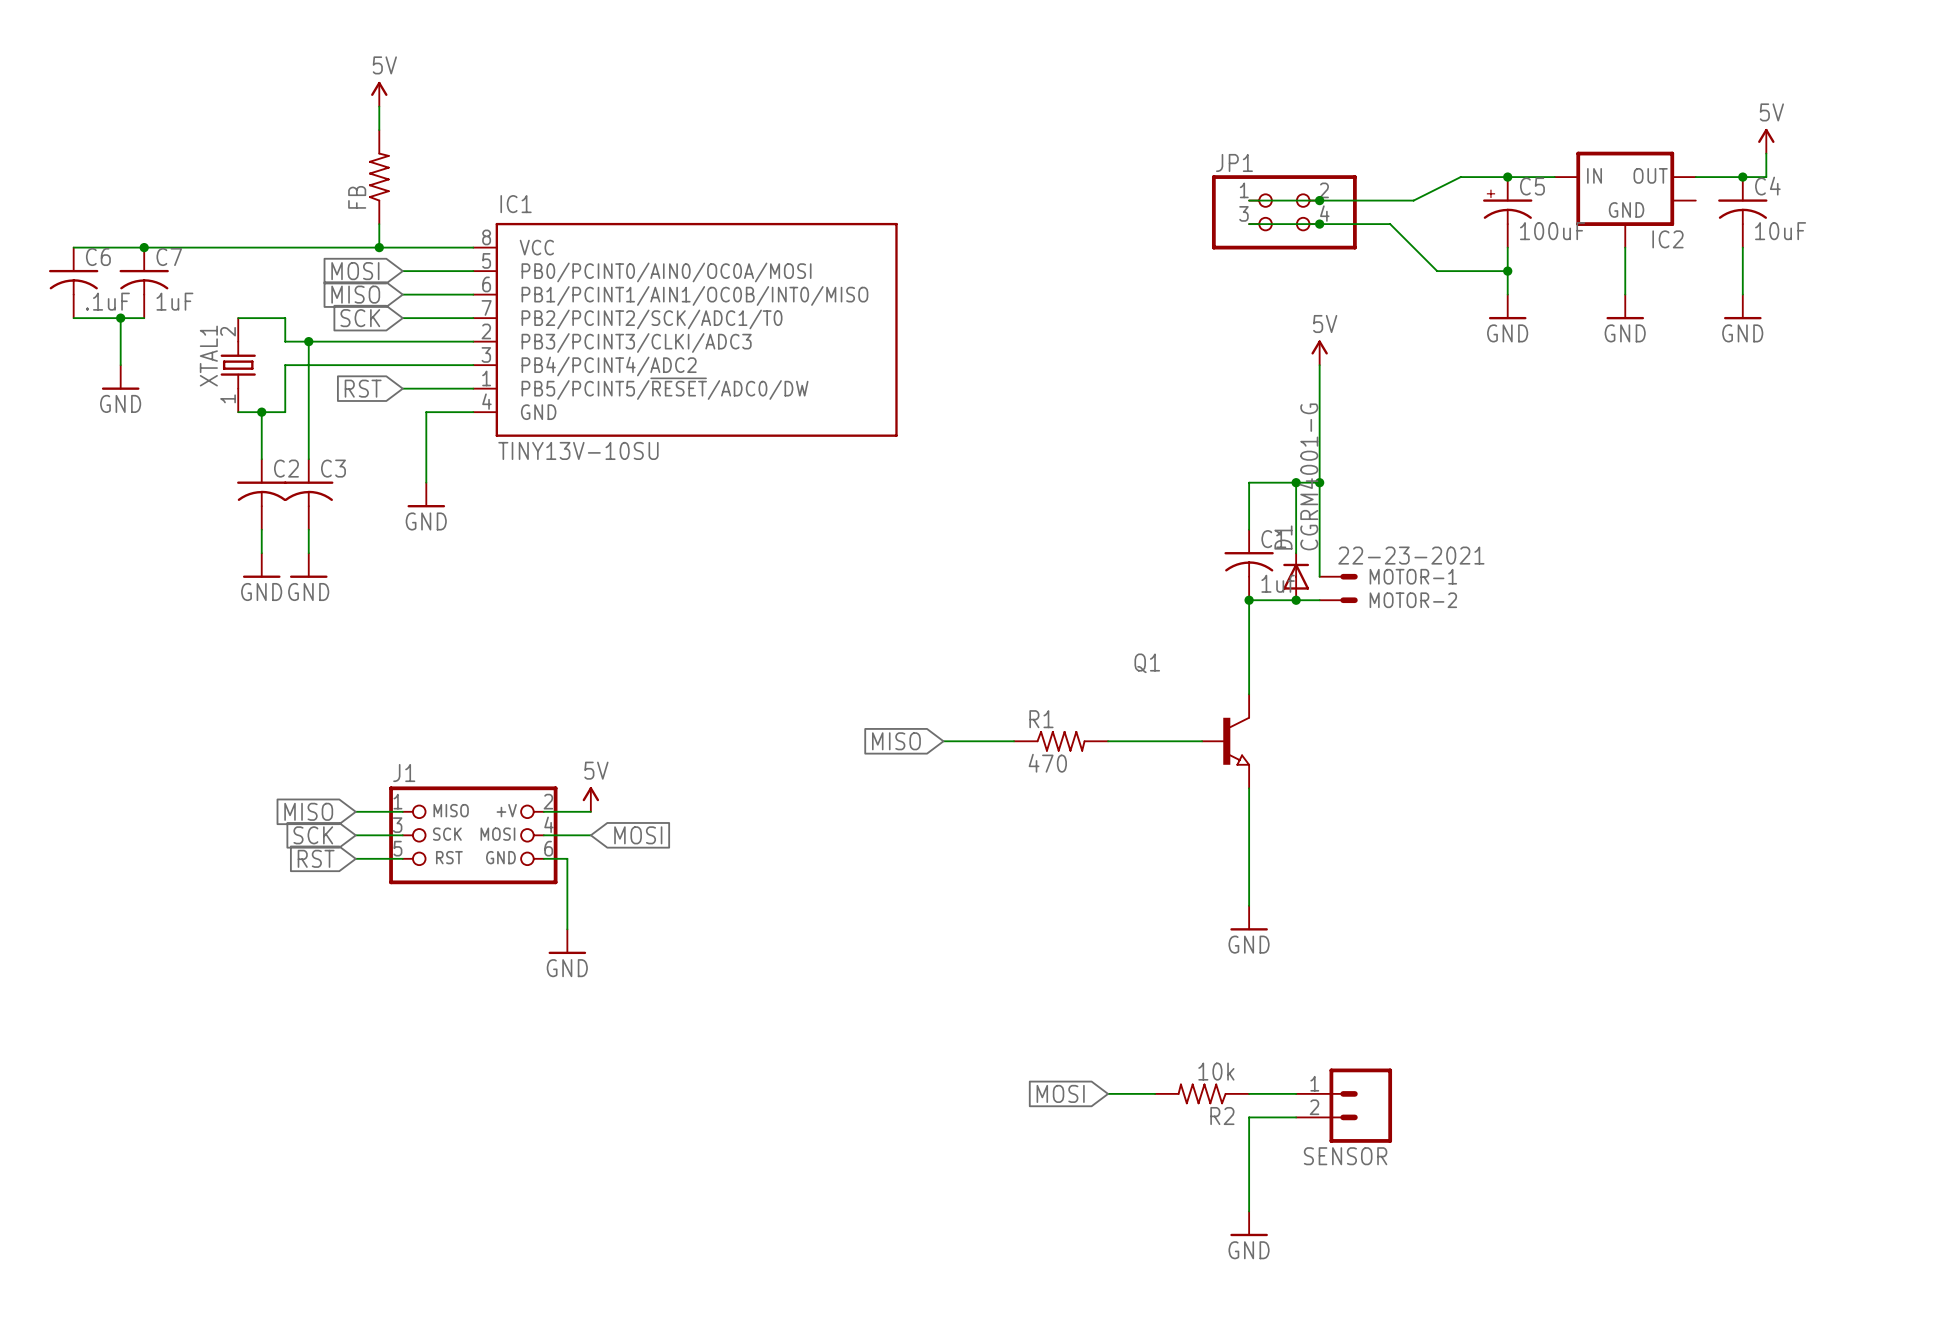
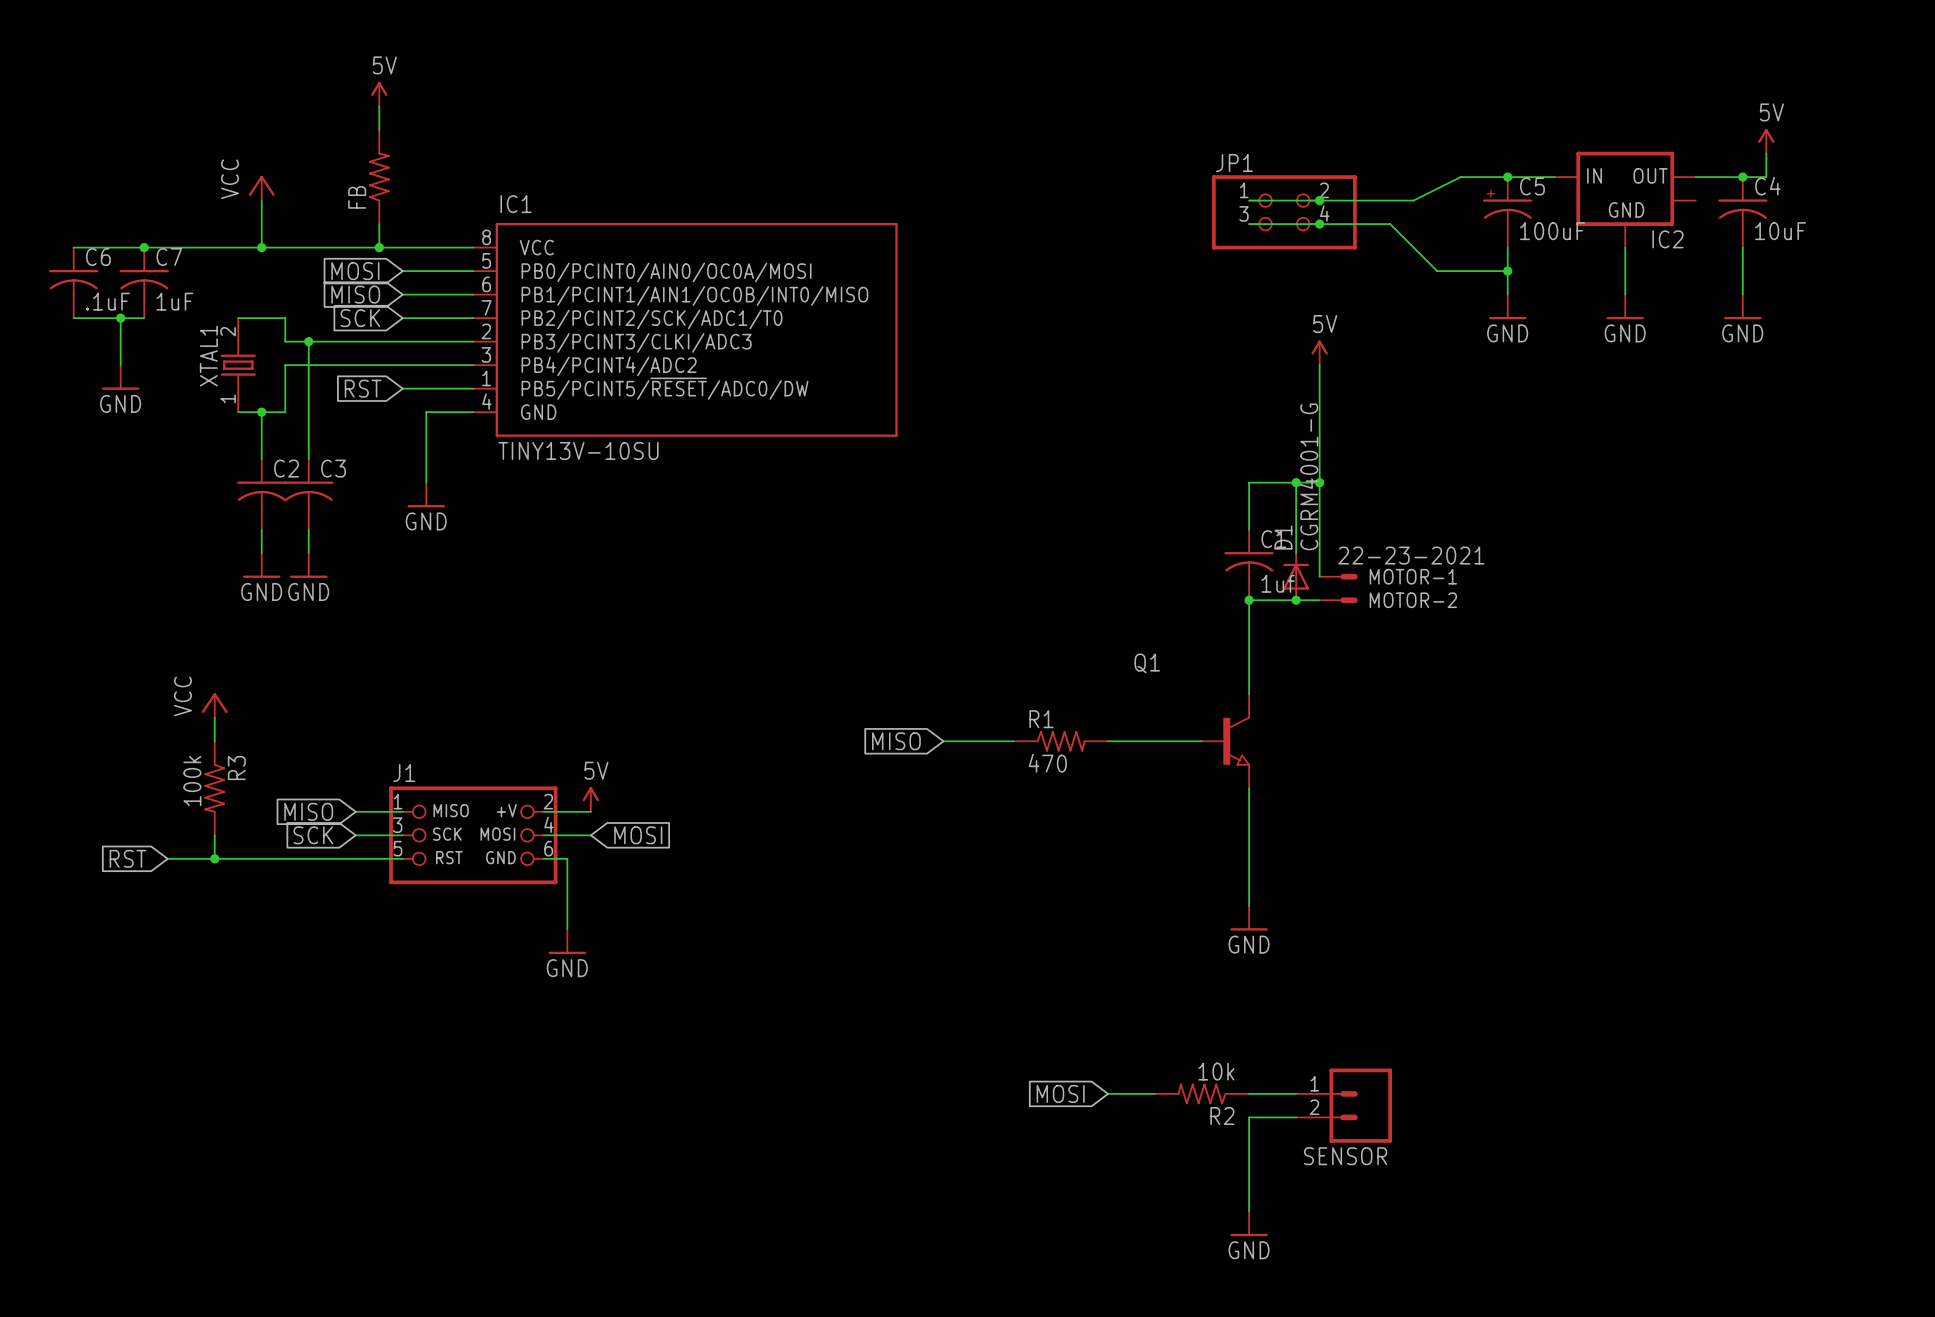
power symbol: none -> VCC (261, 188)
wire: none -> (261, 200) (261, 247)
junction: none -> (261, 247)
power symbol: none -> VCC (214, 705)
wire: none -> (214, 717) (214, 741)
R3: none -> 100k (214, 788)
wire: none -> (214, 835) (214, 858)
wire: none -> (167, 858) (355, 858)
junction: none -> (214, 858)
global label position: RST (316, 858) -> RST (128, 858)

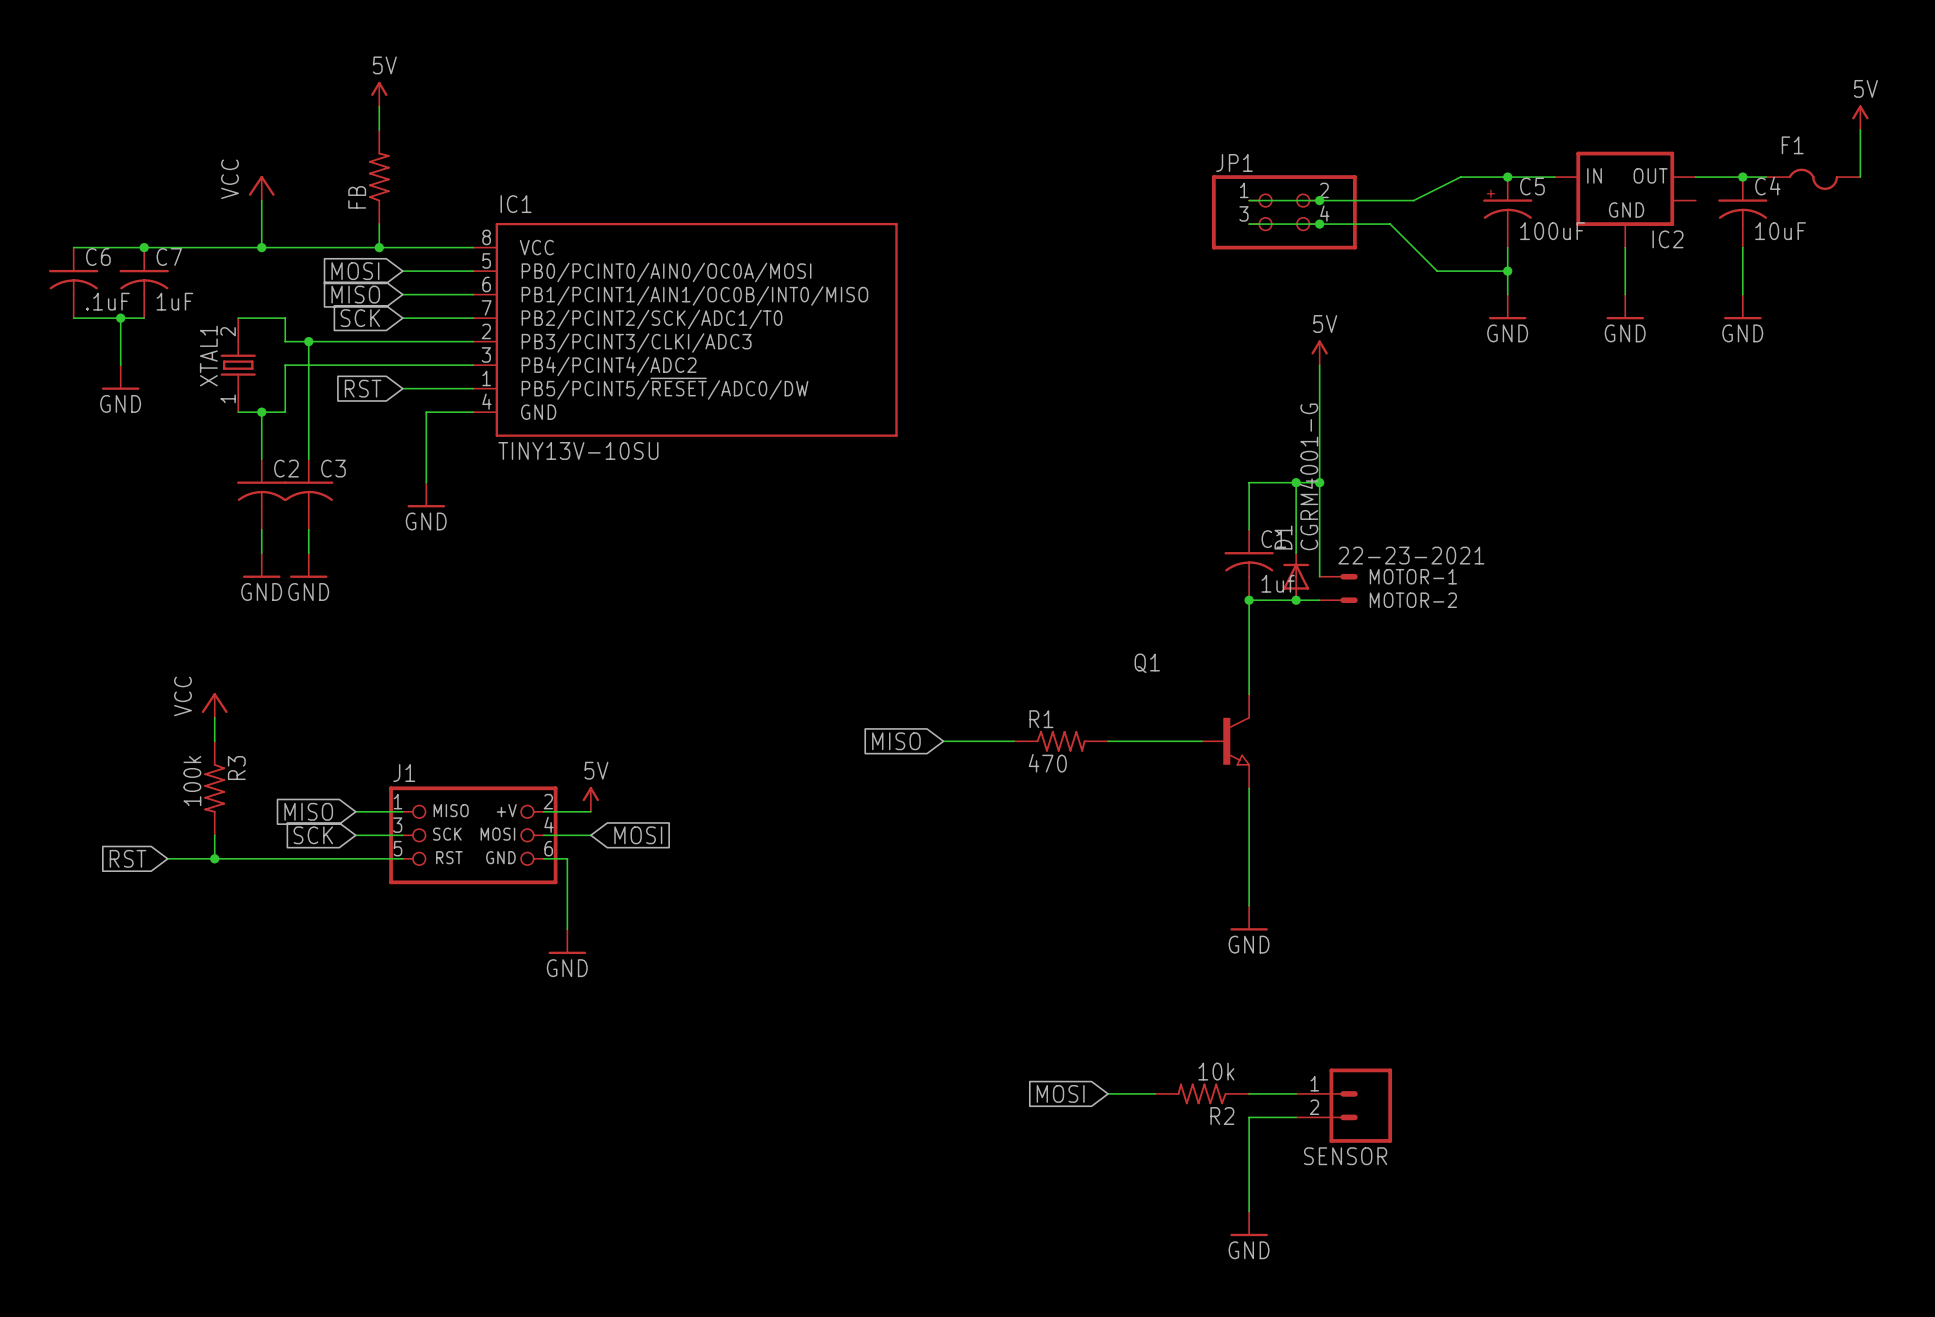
wire: none -> (1860, 130) (1860, 177)
power symbol position: 5V (1766, 141) -> 5V (1860, 117)
wire: (1766, 153) (1766, 177) -> none
F1: none -> (1813, 179)

